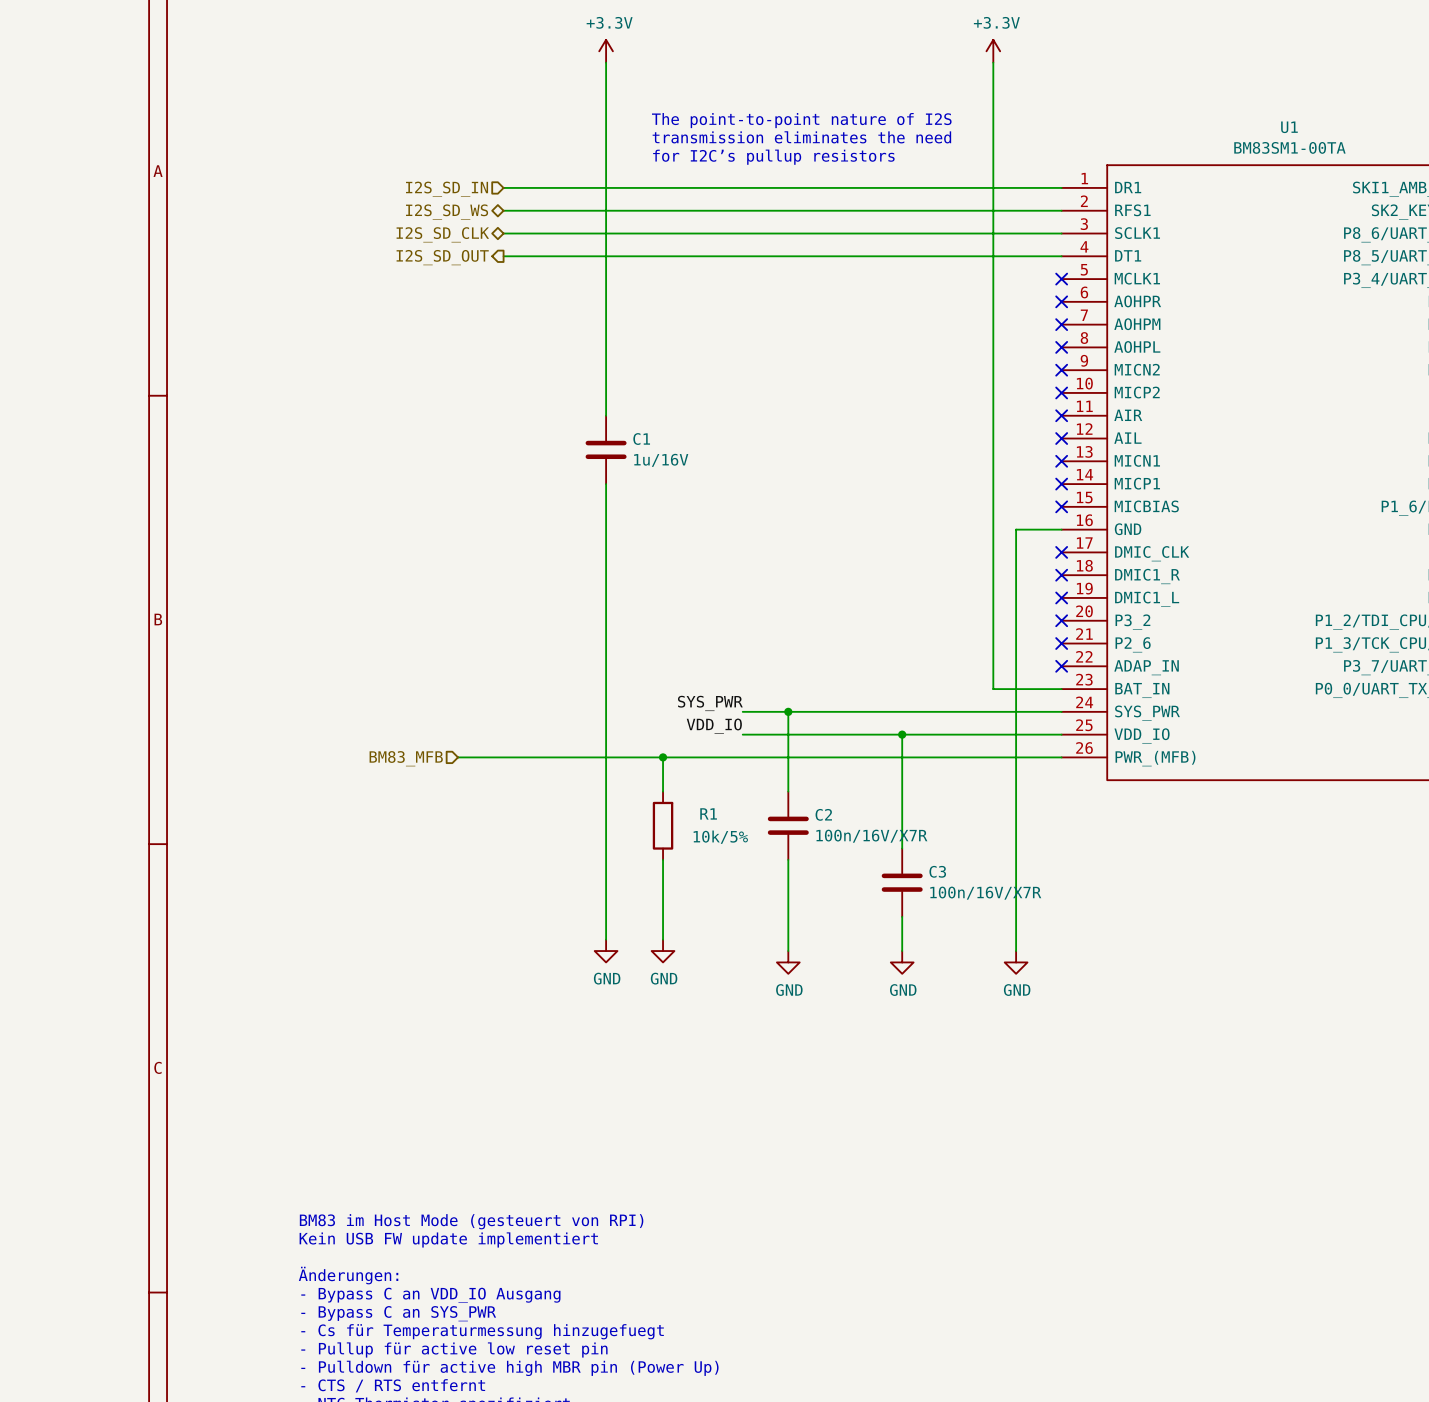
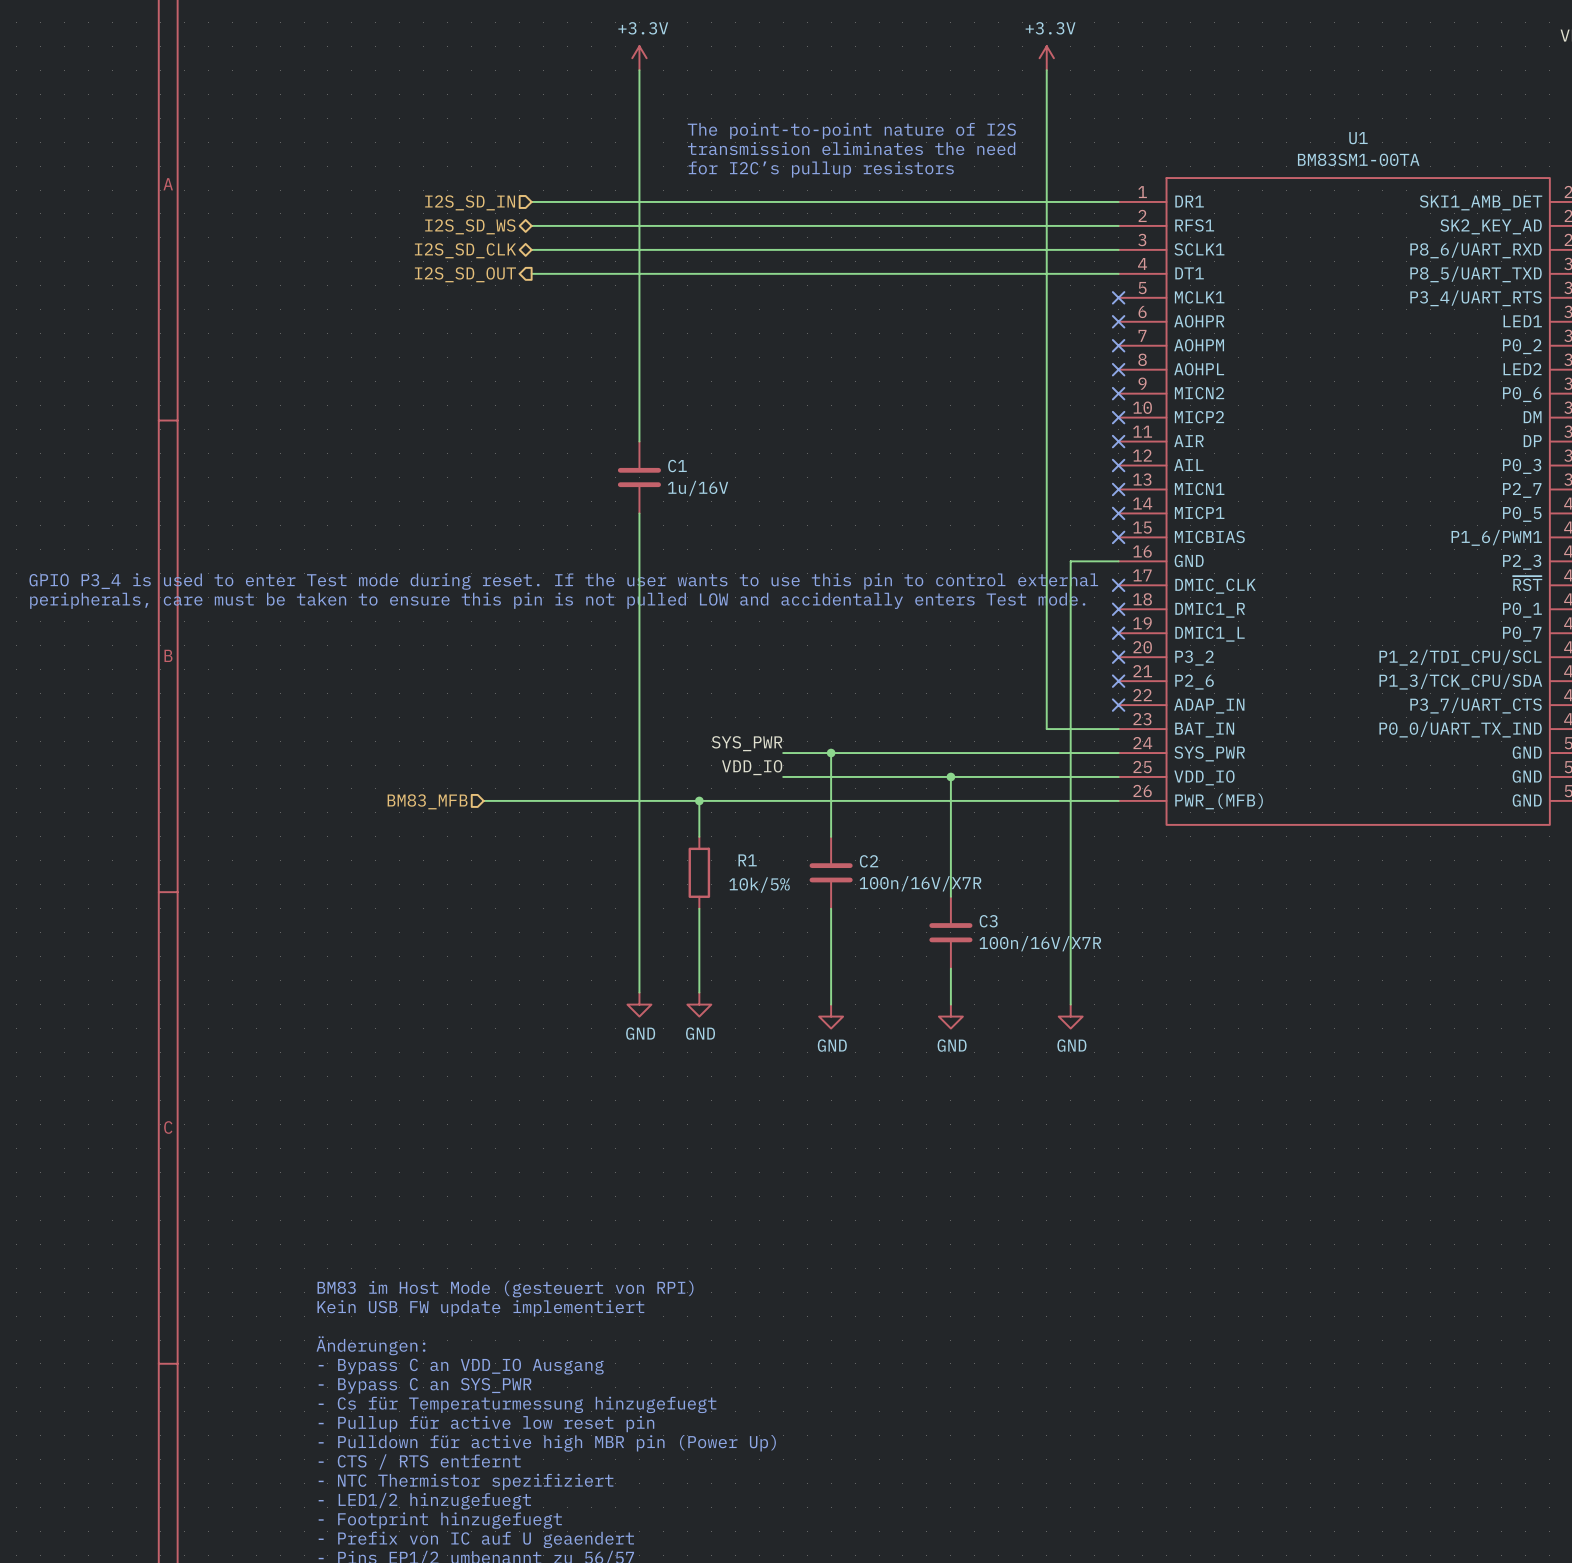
text: none -> GPIO P3_4 is used to enter Test mode during reset. If the user wants to use this pin to control external (563, 581)
text: none -> peripherals, care must be taken to ensure this pin is not pulled LOW and accidentally enters Test mode. (557, 600)

